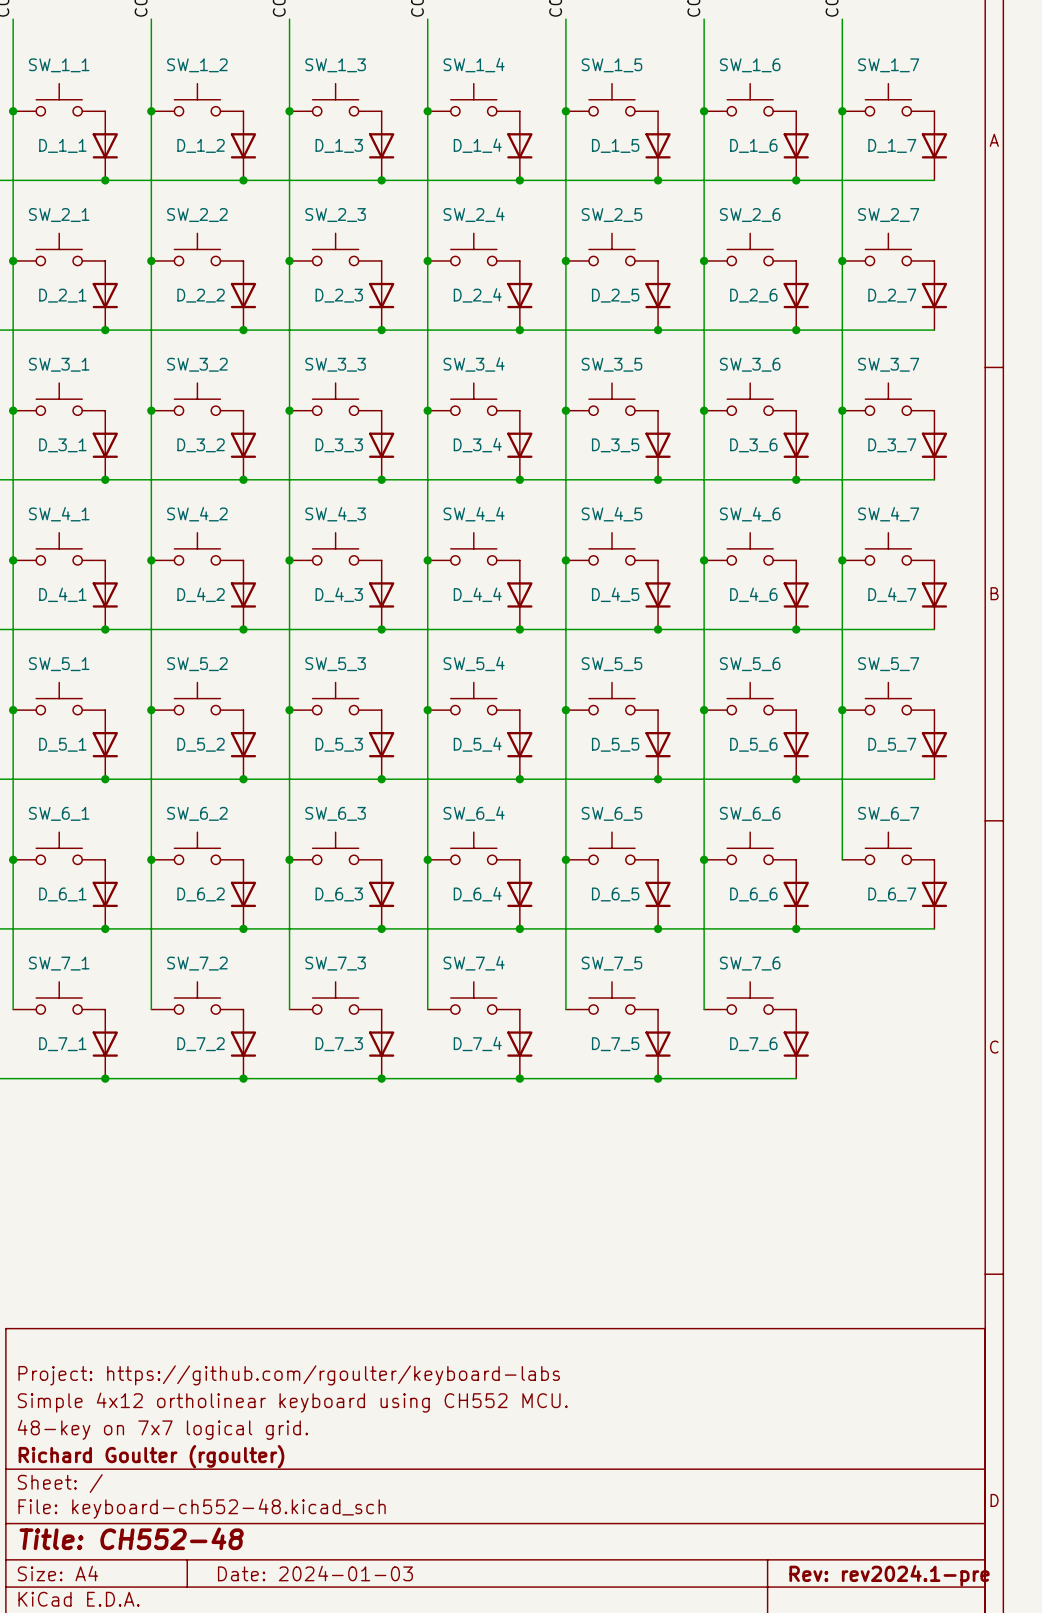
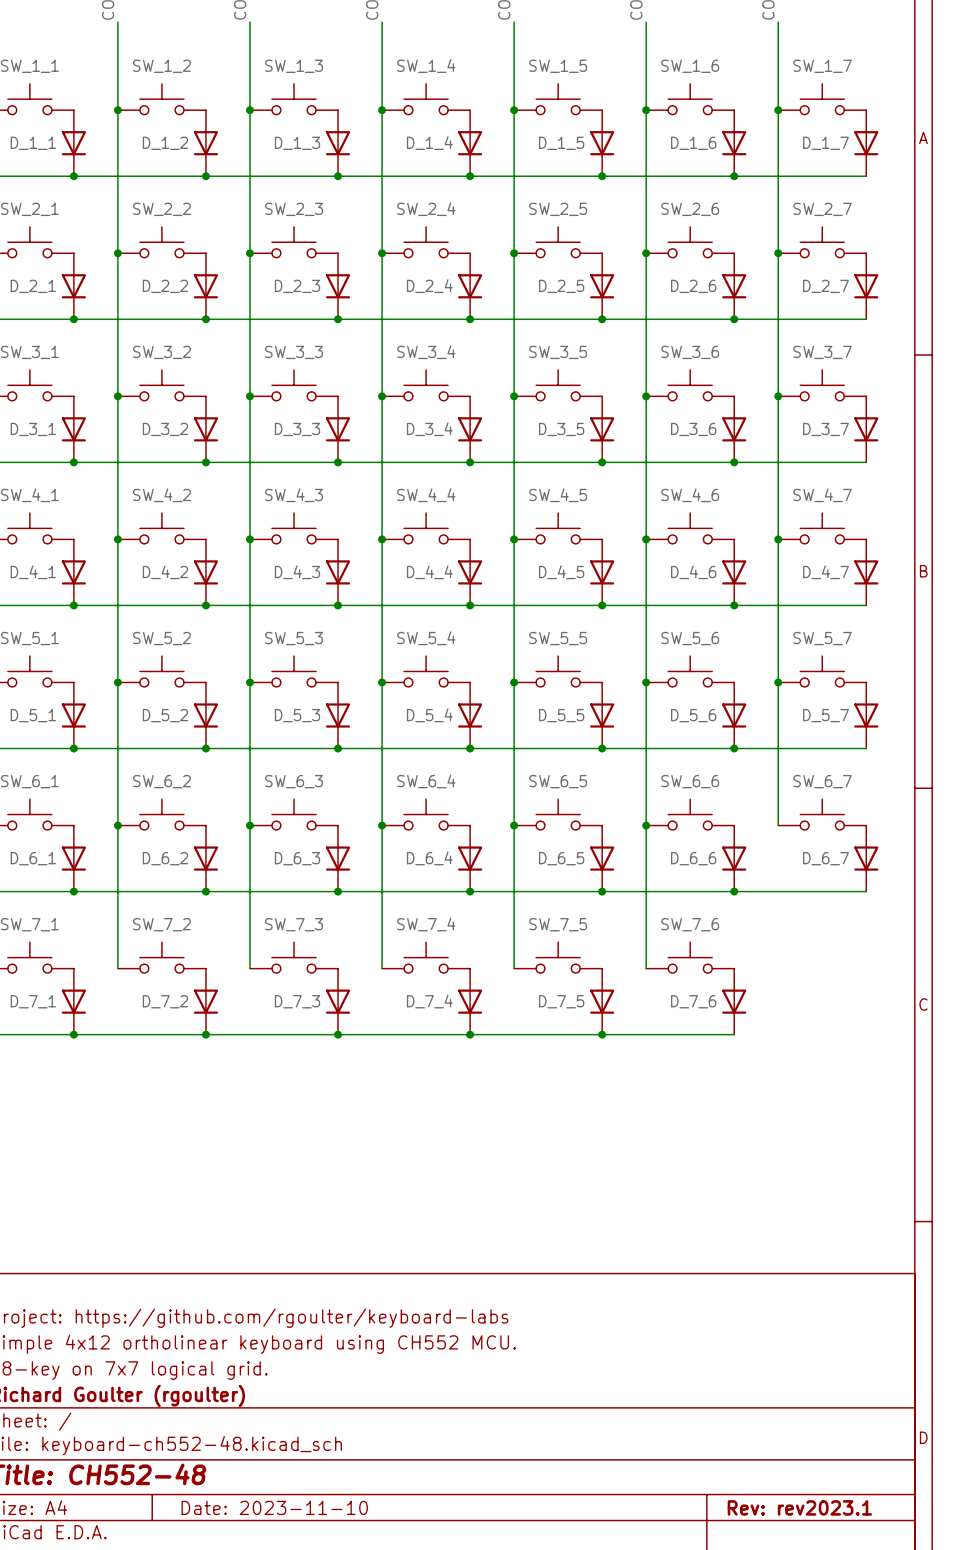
title block: Date: 2024-01-03 (315, 1573) -> Date: 2023-11-10 (274, 1507)
title block: Rev: rev2024.1-pre (889, 1575) -> Rev: rev2023.1 (799, 1507)

